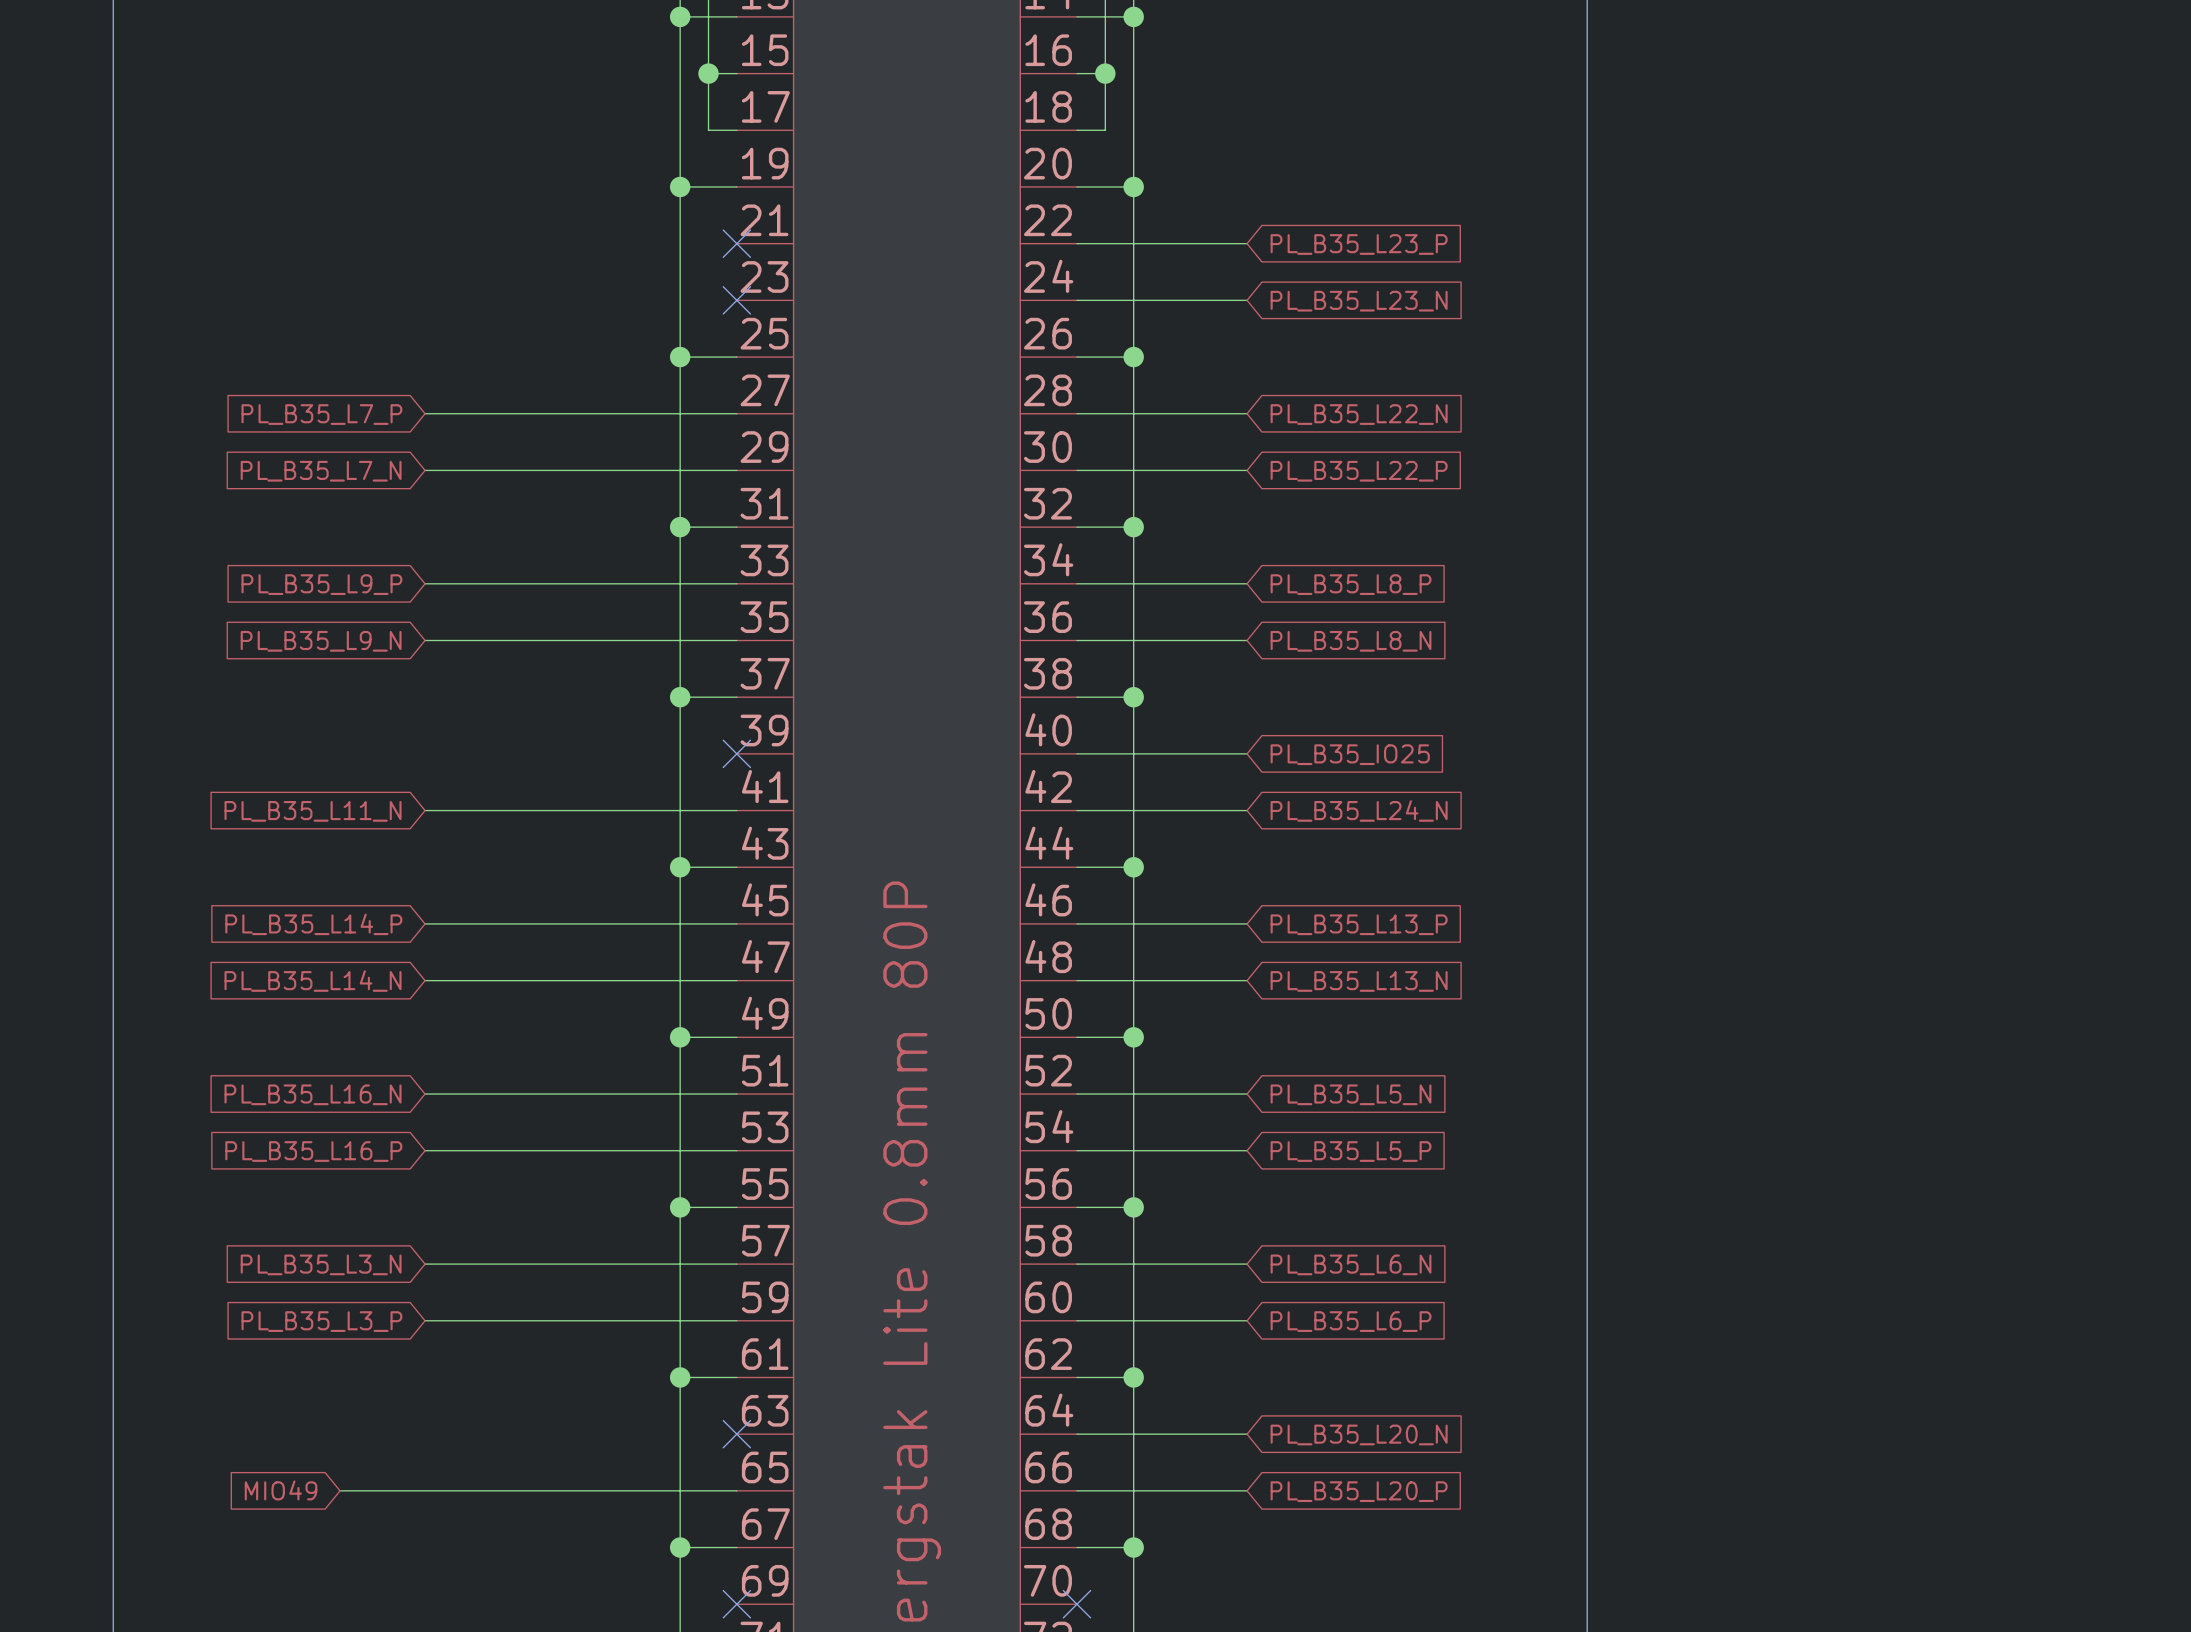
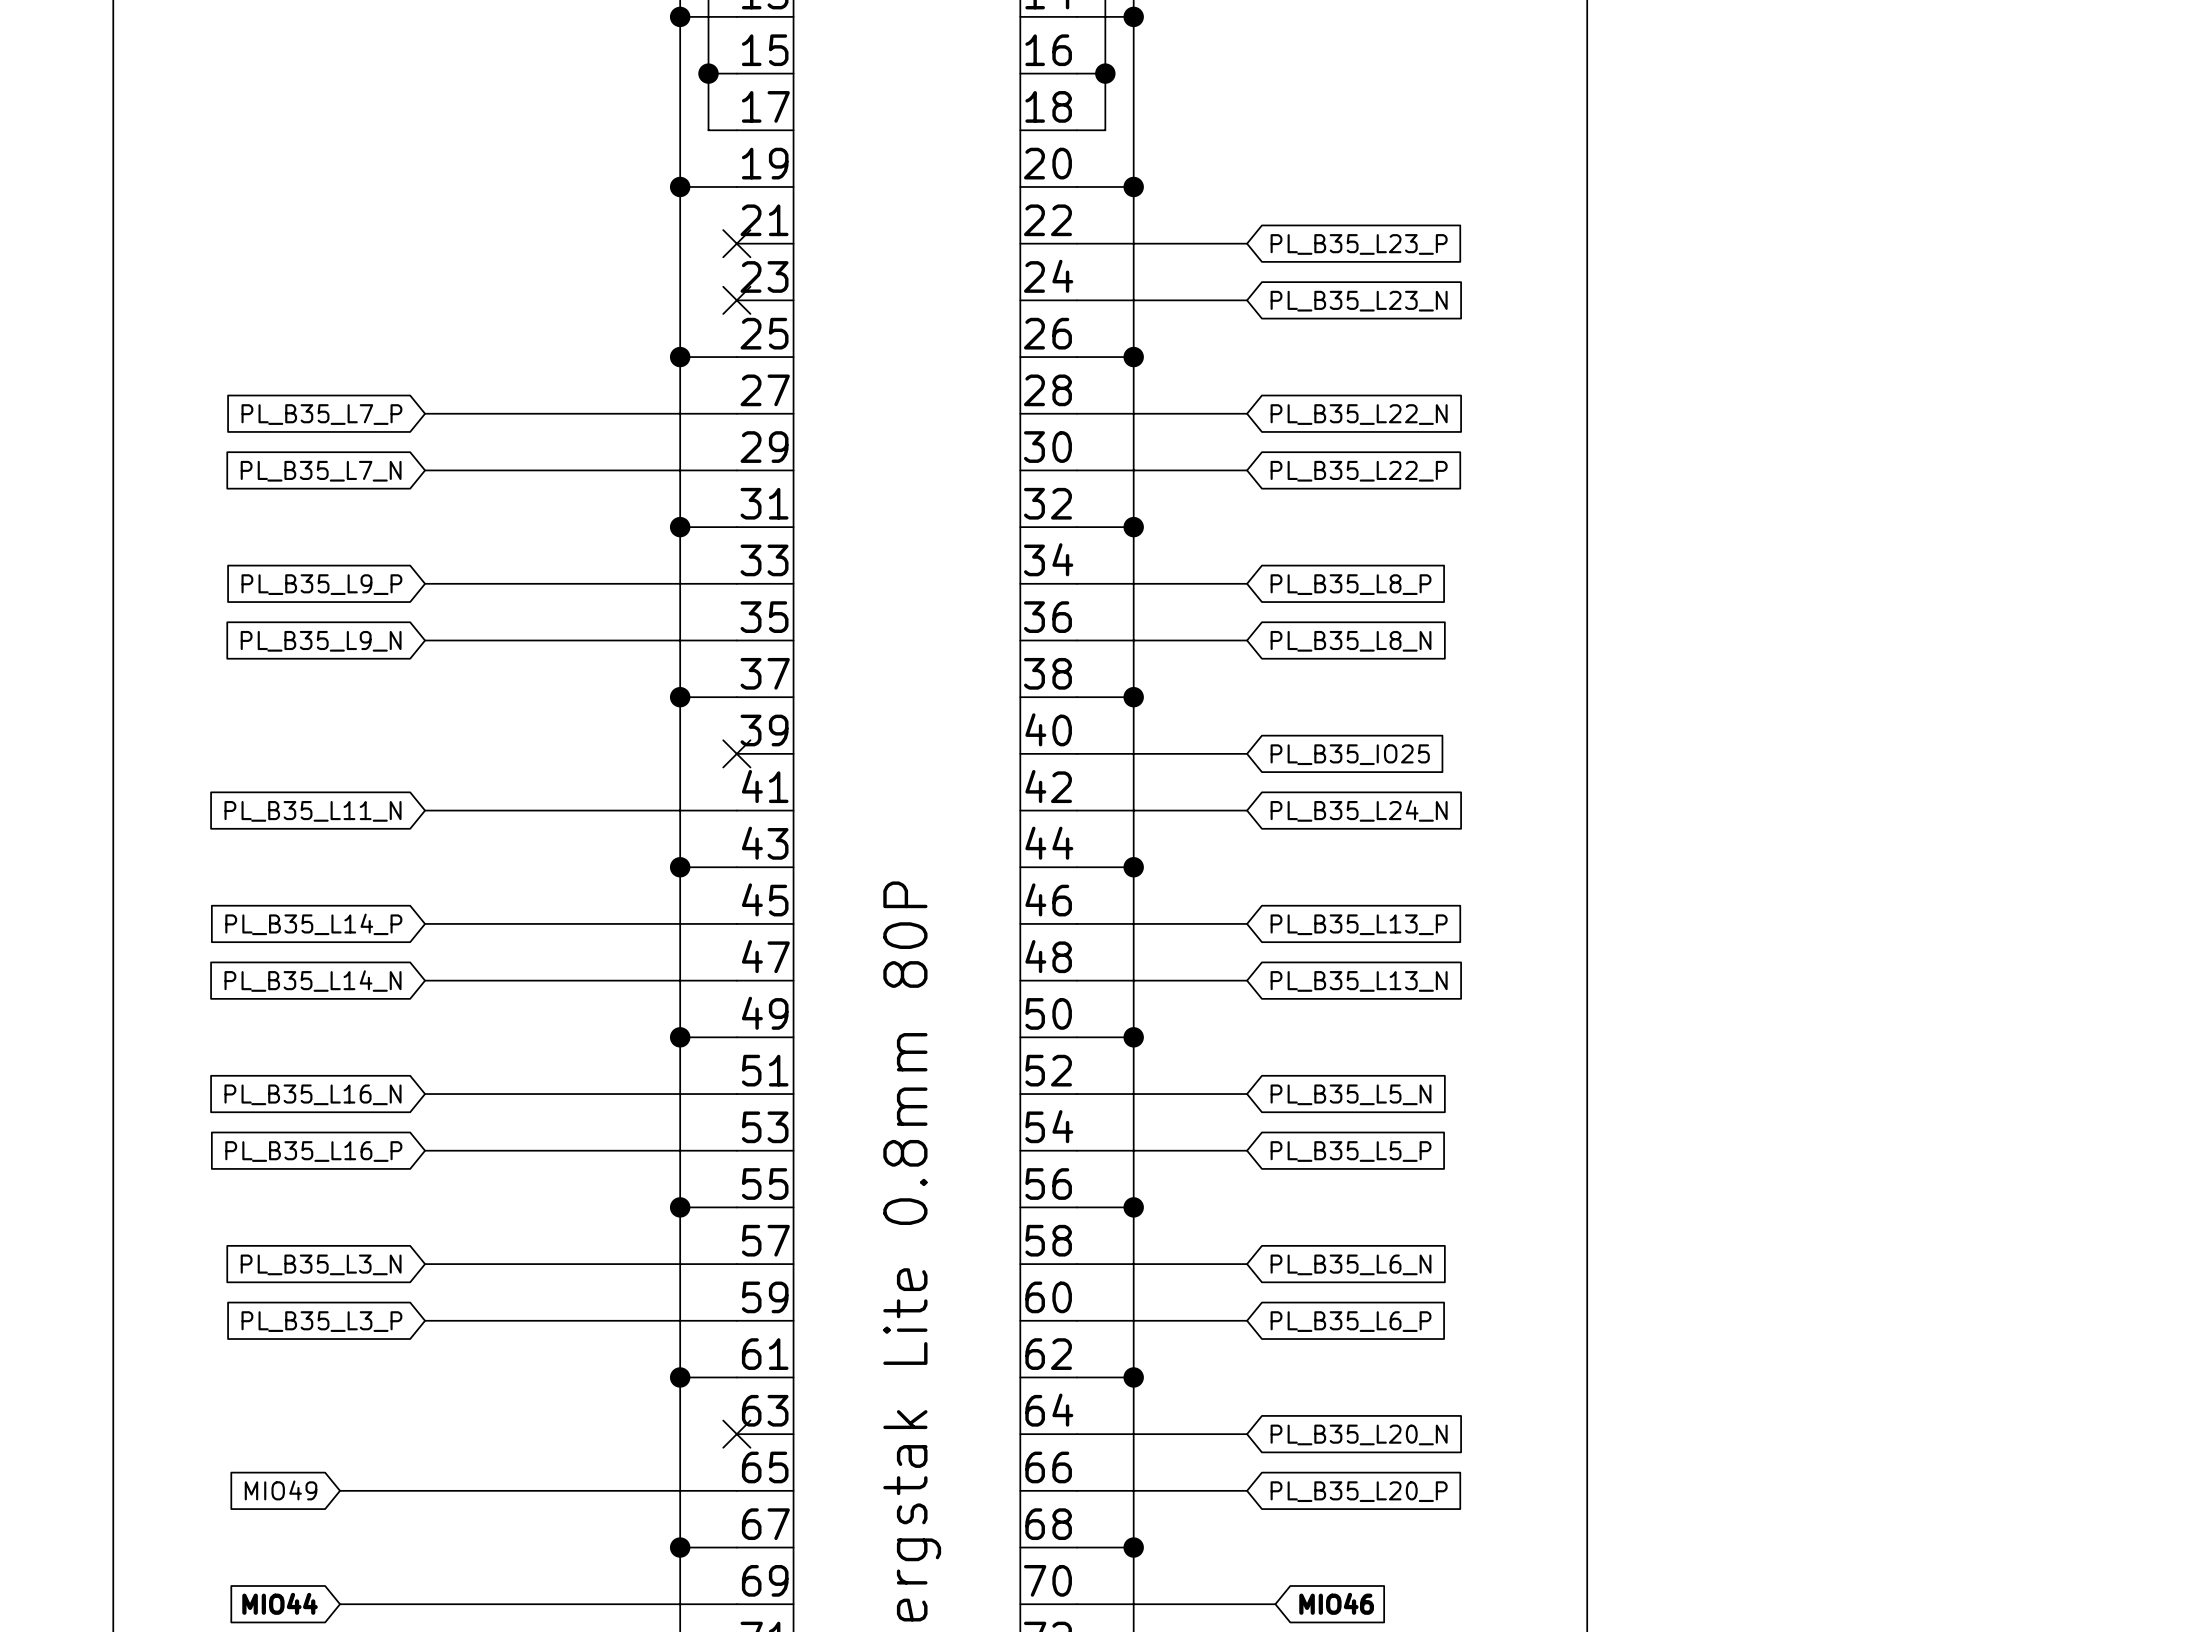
global label: none -> MIO44 (280, 1603)
global label: none -> MIO46 (1336, 1603)
wire: none -> (340, 1604) (736, 1604)
no-connect mark: (736, 1604) -> none
wire: none -> (1076, 1604) (1275, 1604)
no-connect mark: (1076, 1604) -> none

